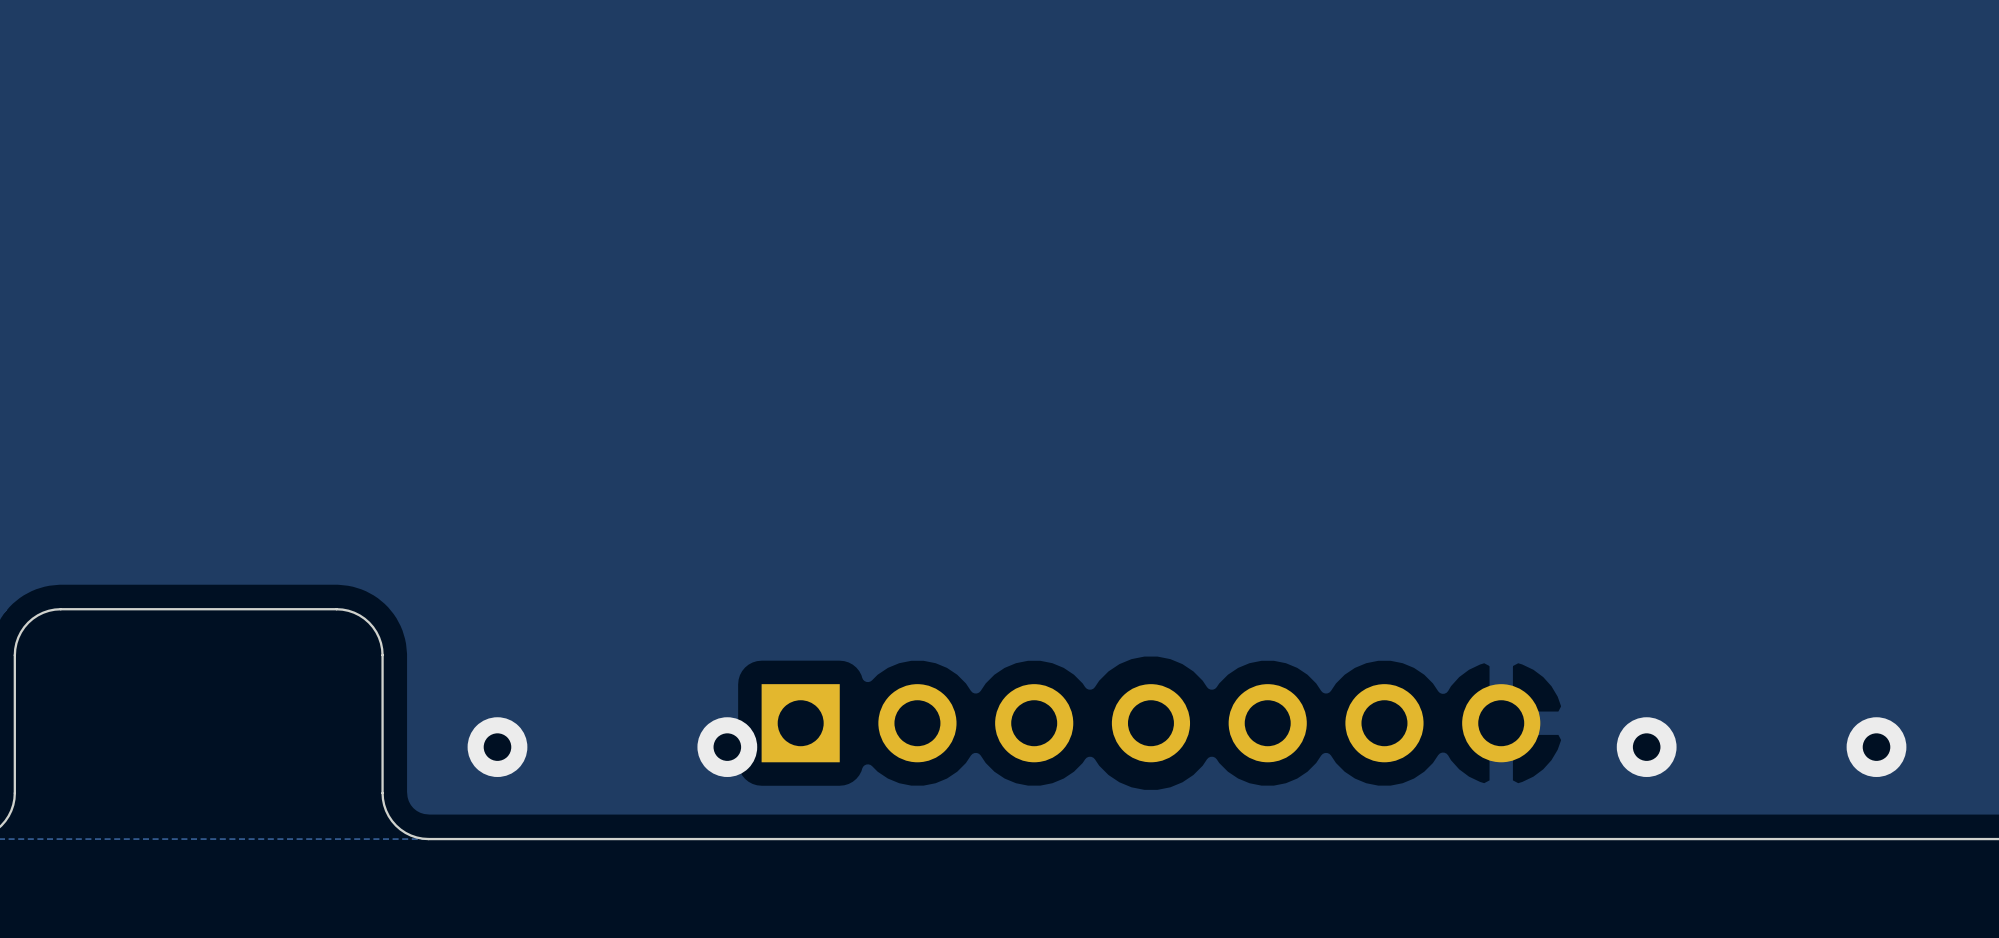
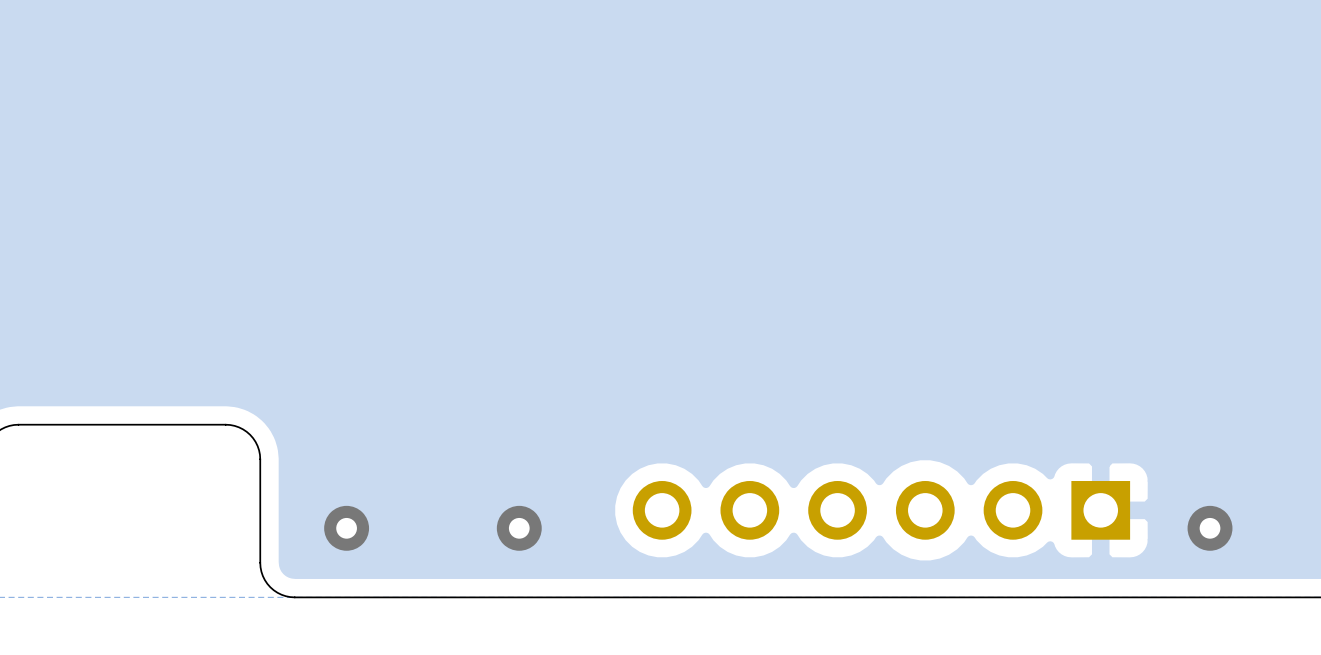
part: (1150, 723) -> none
part: none -> (881, 510)

